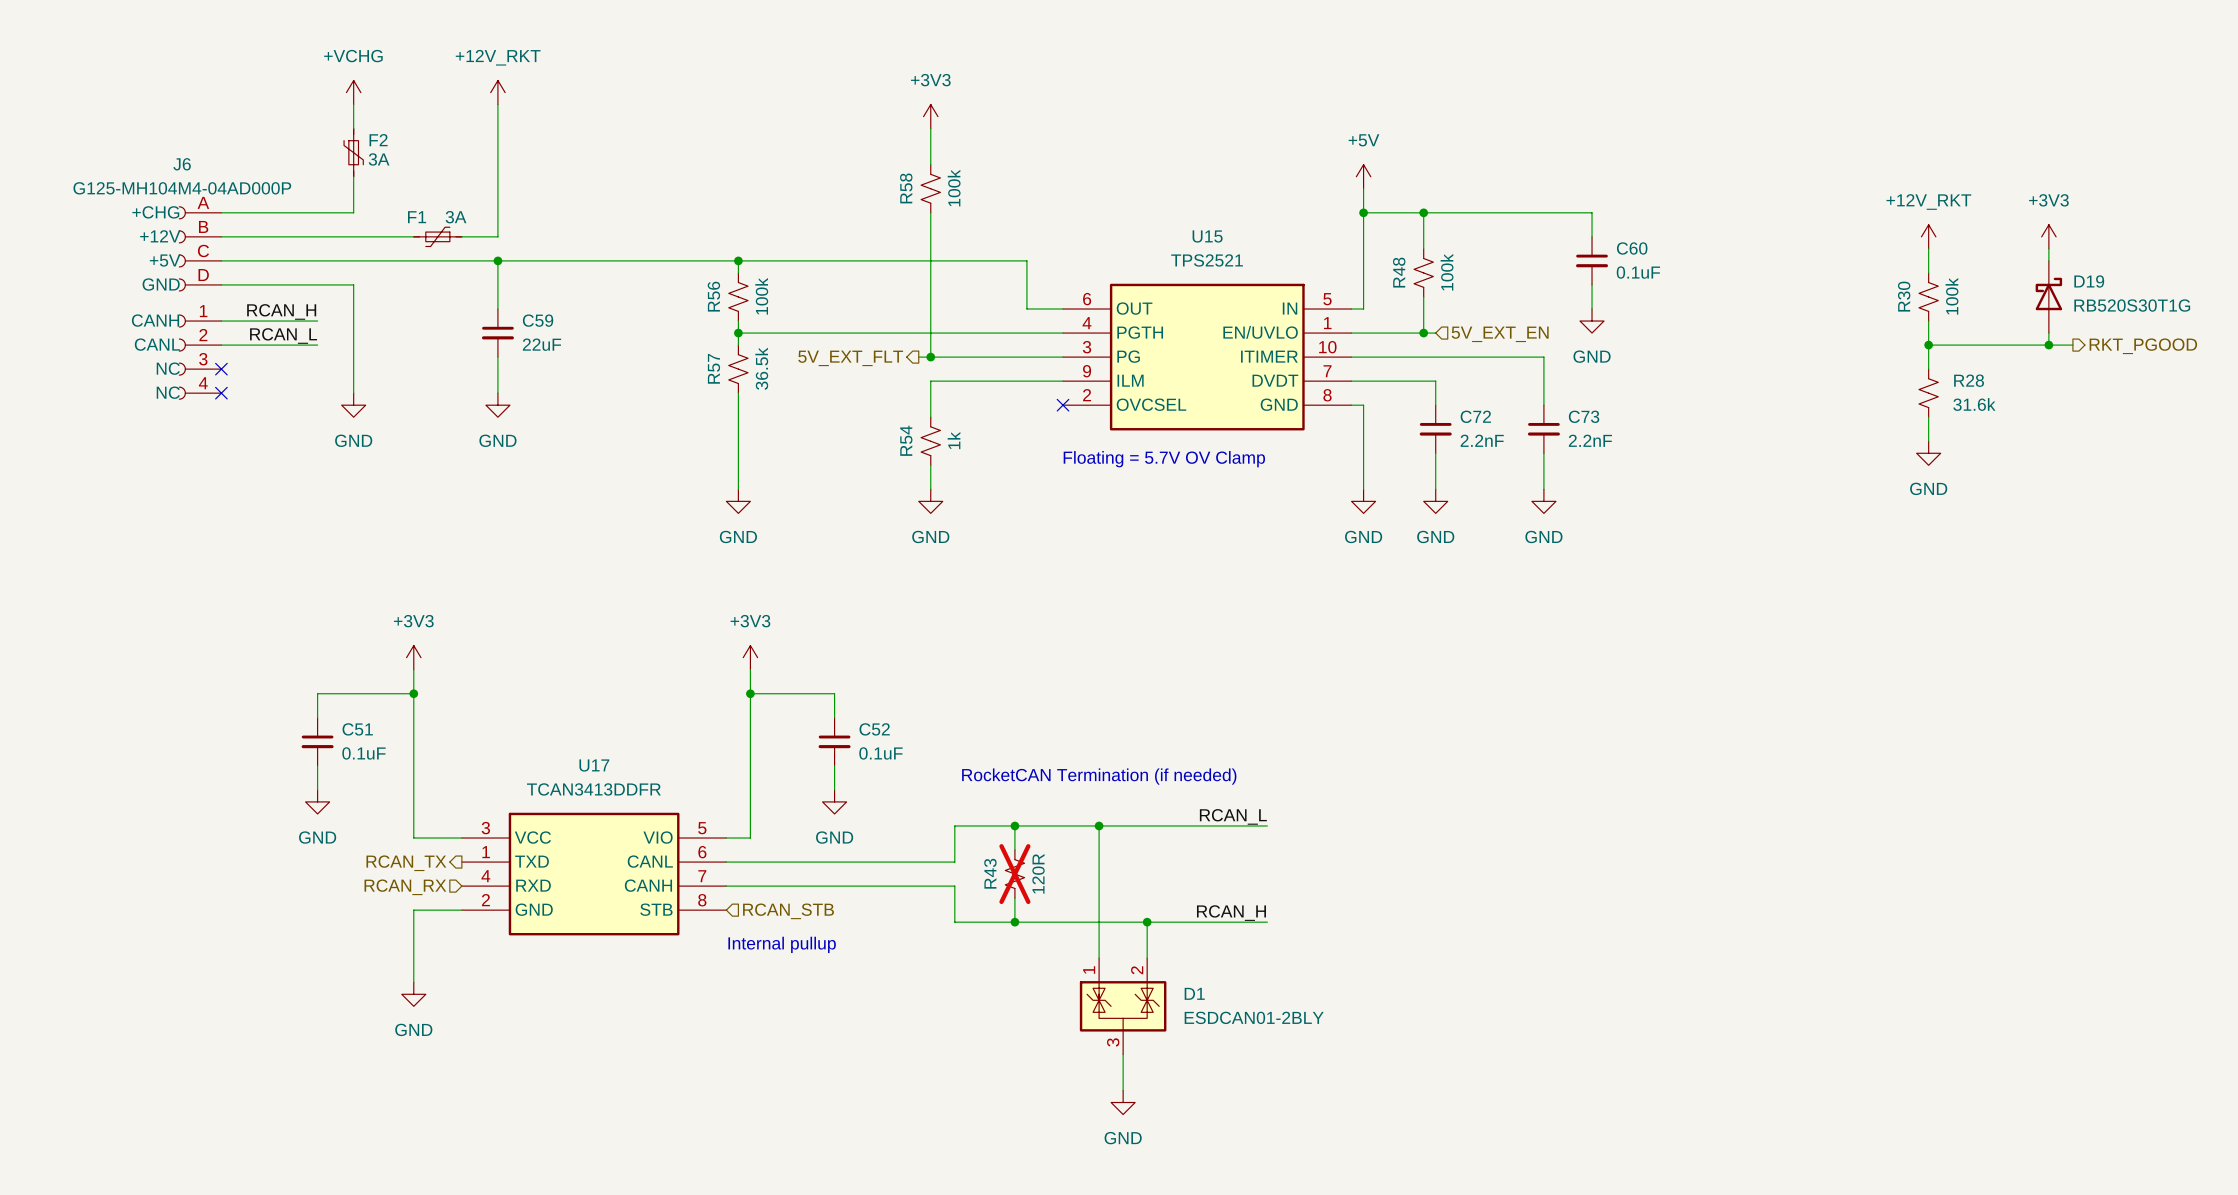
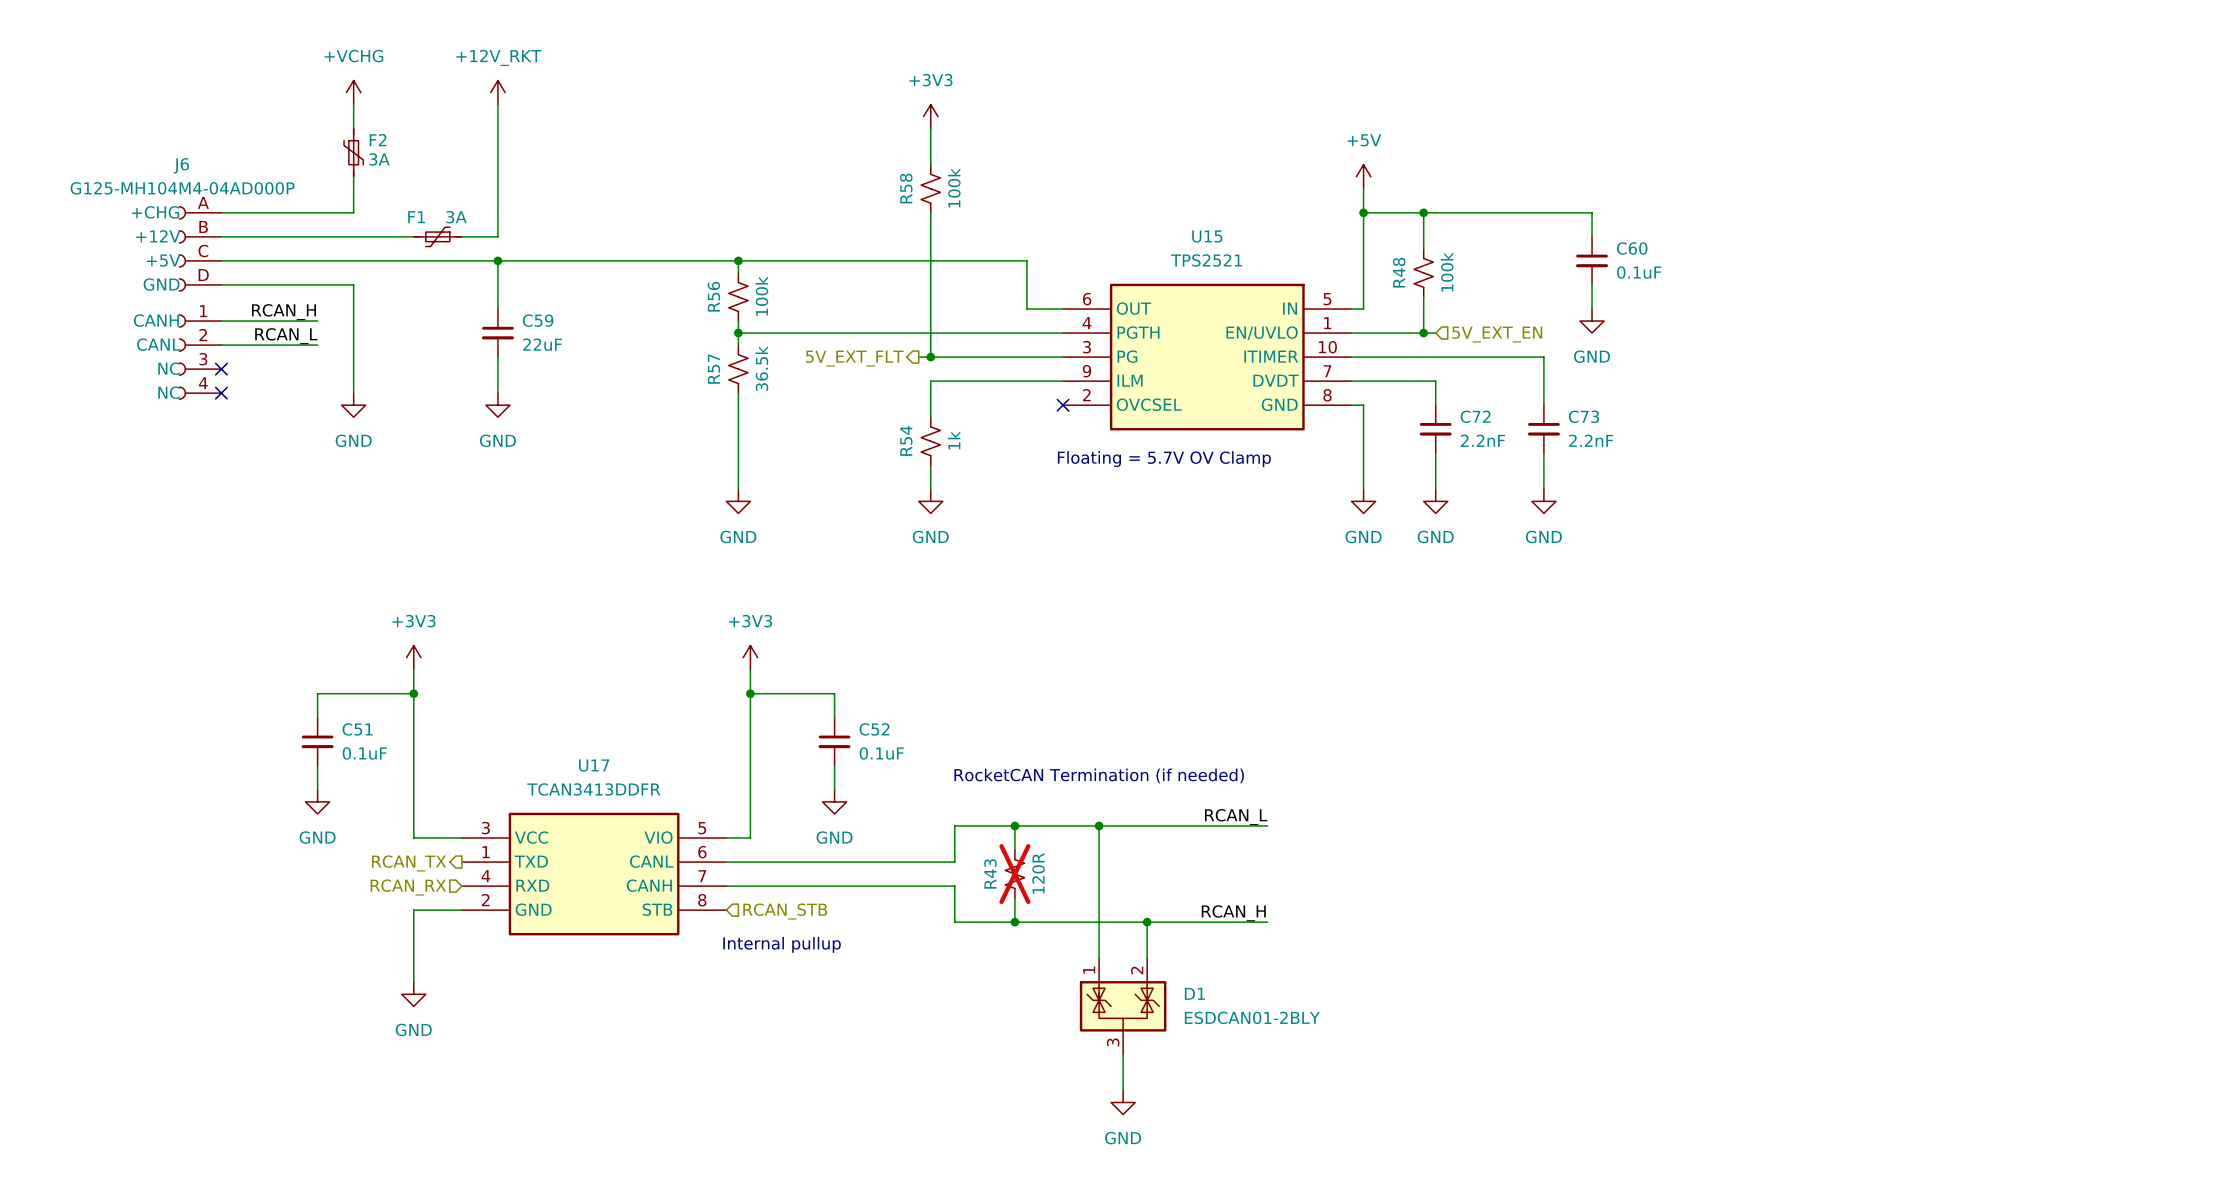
power symbol: +12V_RKT (1928, 236) -> none
power symbol: +3V3 (2048, 236) -> none
wire: (1928, 248) (1928, 272) -> none
wire: (2048, 248) (2048, 260) -> none
R30: 100k (1928, 296) -> none
D19: RB520S30T1G (2048, 296) -> none
wire: (1928, 321) (1928, 369) -> none
wire: (2048, 333) (2048, 345) -> none
wire: (1928, 345) (2072, 345) -> none
junction: (1928, 345) -> none
junction: (2048, 345) -> none
hierarchical label: RKT_PGOOD (2143, 346) -> none
R28: 31.6k (1928, 393) -> none
wire: (1928, 417) (1928, 441) -> none
power symbol: GND (1928, 453) -> none

